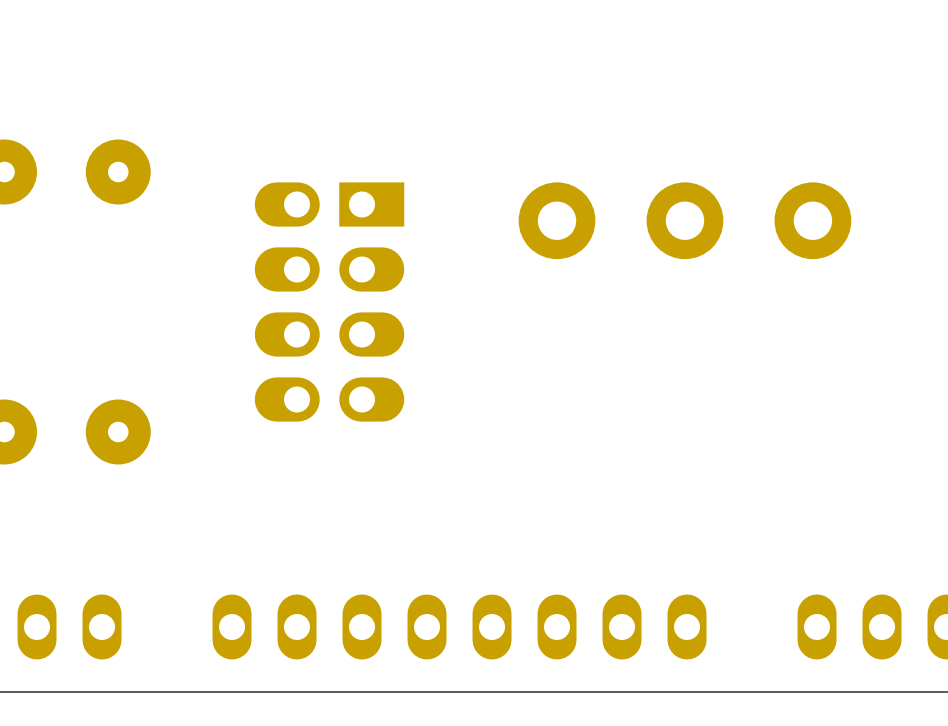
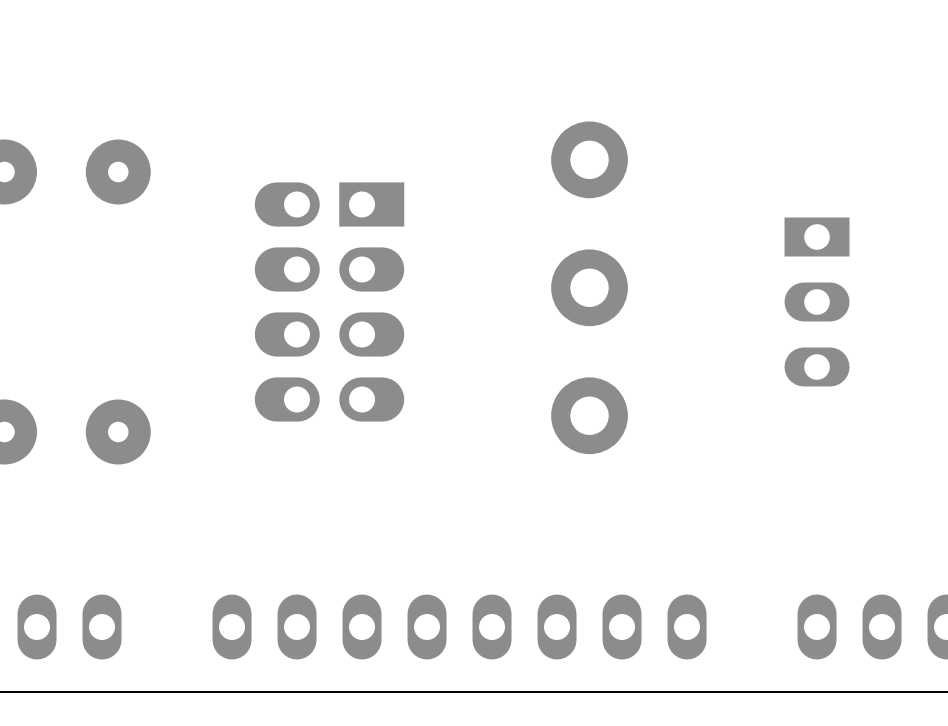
part rotation: 0° (684, 220) -> 90° clockwise (589, 287)
part: none -> (817, 301)

